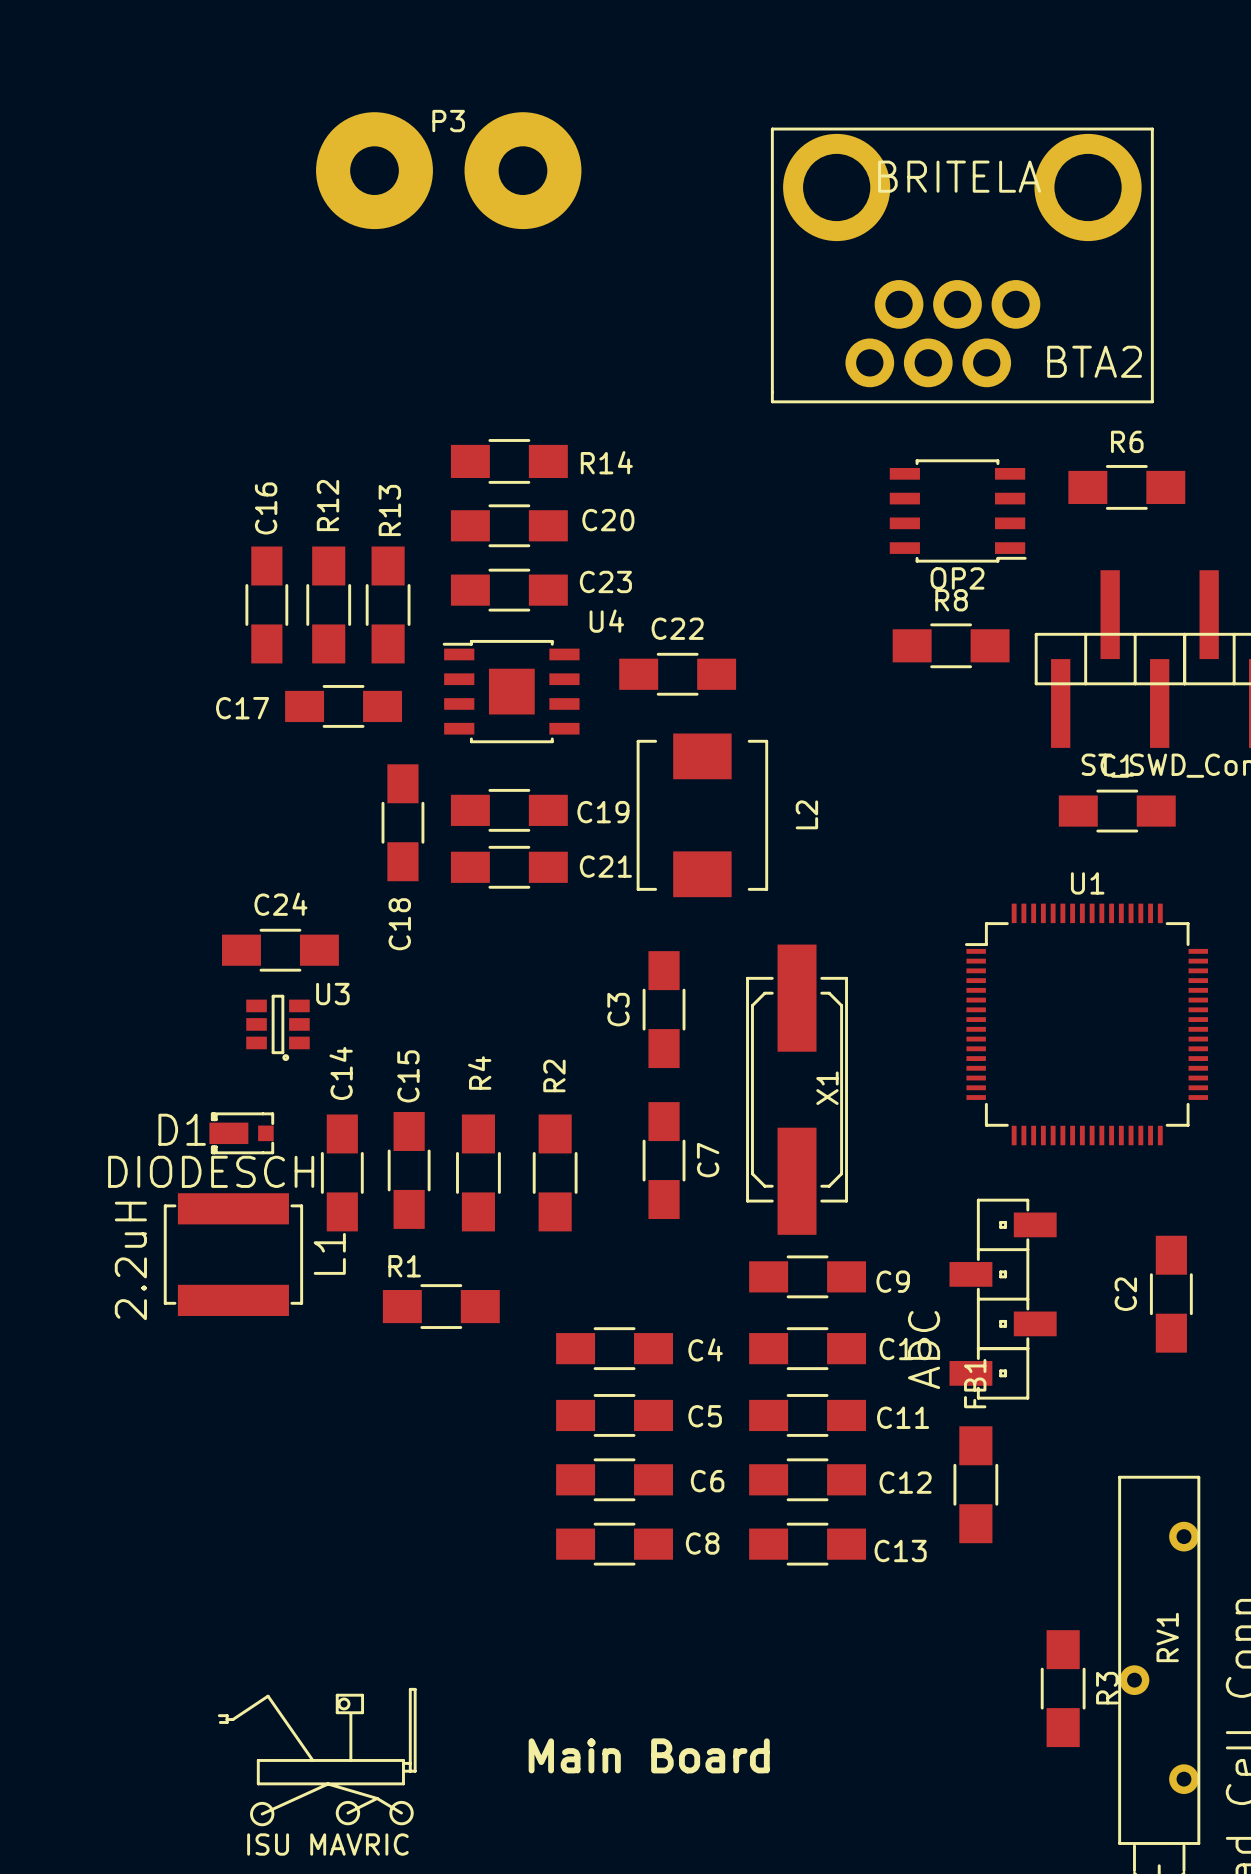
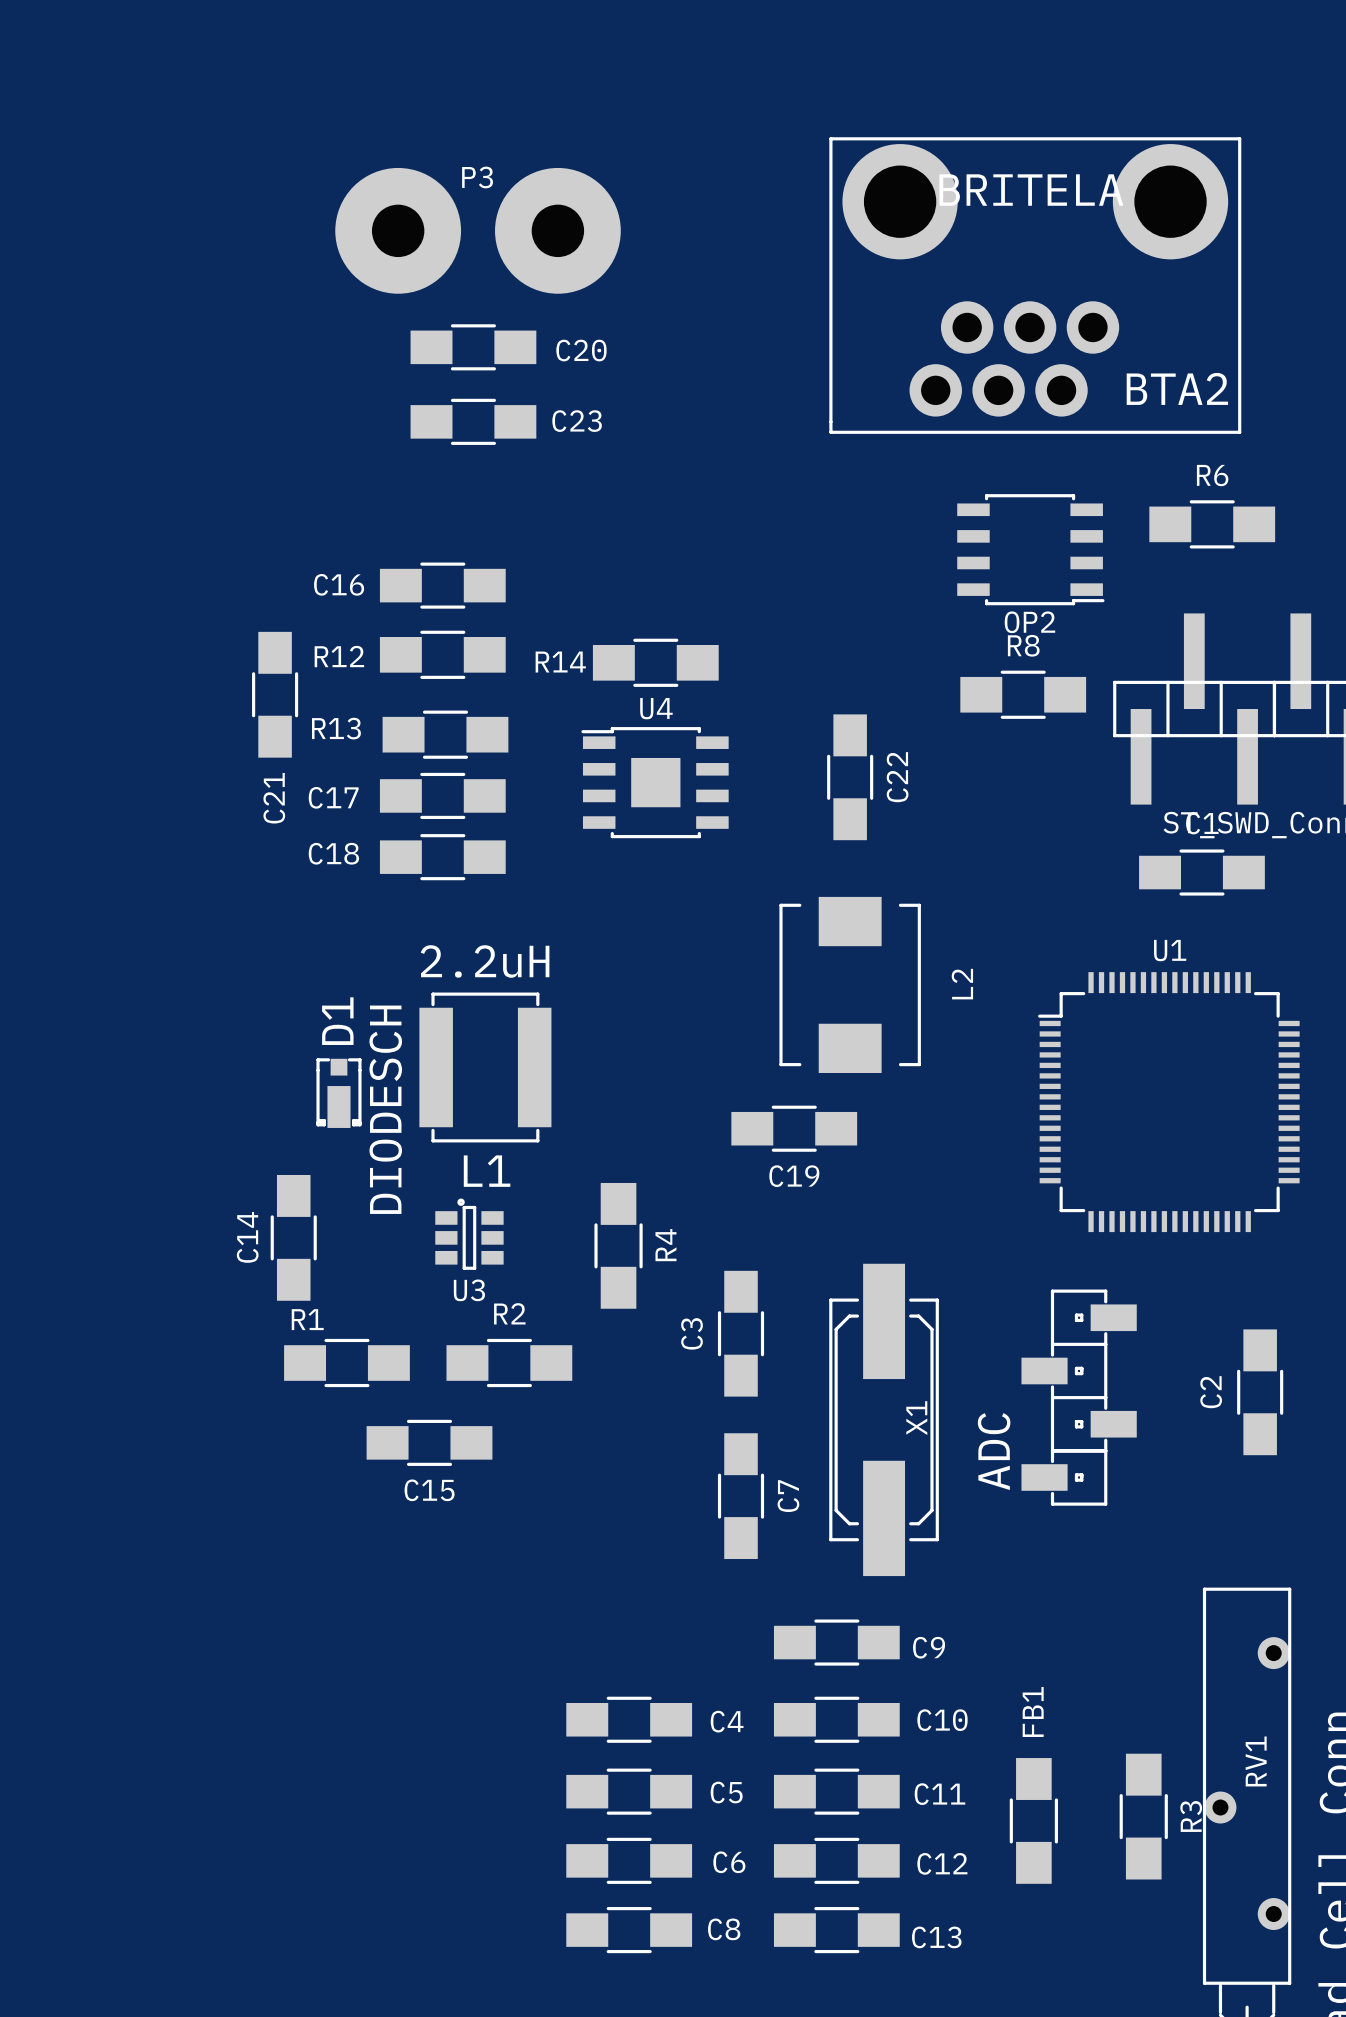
P3 position: (448, 170) -> (478, 230)
R14 position: (509, 461) -> (655, 662)
R14 name position: R14 (606, 462) -> R14 (560, 662)
R12 name position: R12 (327, 505) -> R12 (339, 656)
C16 name position: C16 (266, 508) -> C16 (339, 584)
R13 name position: R13 (389, 510) -> R13 (336, 728)
C20 name position: C20 (608, 520) -> C20 (581, 350)
C20 position: (509, 525) -> (473, 347)
C23 name position: C23 (605, 581) -> C23 (577, 421)
C23 position: (509, 590) -> (473, 421)
C16 rotation: 0° (266, 604) -> 90° clockwise (442, 585)
C16 position: (266, 604) -> (442, 585)
R12 rotation: 0° (328, 604) -> 90° clockwise (442, 654)
R12 position: (328, 604) -> (442, 654)
R13 rotation: 0° (388, 604) -> 90° clockwise (445, 734)
R13 position: (388, 604) -> (445, 734)
U4 name position: U4 (606, 621) -> U4 (656, 708)
C22 rotation: 0° (677, 674) -> 90° clockwise (850, 777)
C22 position: (677, 674) -> (850, 777)
U4 position: (511, 691) -> (655, 782)
C17 position: (343, 706) -> (442, 795)
C19 position: (509, 810) -> (794, 1128)
C19 name position: C19 (603, 812) -> C19 (794, 1176)
L2 position: (702, 815) -> (850, 984)
C18 rotation: 0° (402, 822) -> 90° clockwise (442, 857)
C21 rotation: 0° (509, 867) -> 90° clockwise (275, 694)
C21 position: (509, 867) -> (275, 694)
C24: (280, 950) -> none
U3 name position: U3 (332, 994) -> U3 (469, 1290)
C3 position: (664, 1009) -> (741, 1333)
U3 rotation: 0° (277, 1027) -> 180° (469, 1234)
U3 position: (277, 1027) -> (469, 1234)
C14 name position: C14 (341, 1073) -> C14 (247, 1237)
R4 name position: R4 (479, 1073) -> R4 (665, 1245)
R2 name position: R2 (554, 1075) -> R2 (509, 1313)
C15 name position: C15 (408, 1076) -> C15 (429, 1490)
X1 position: (797, 1089) -> (884, 1419)
D1 name position: D1 (182, 1129) -> D1 (337, 1021)
D1 rotation: 0° (241, 1133) -> 90° counterclockwise (338, 1093)
D1 position: (241, 1133) -> (338, 1093)
C7 position: (664, 1160) -> (741, 1496)
C15 rotation: 0° (409, 1170) -> 90° clockwise (429, 1442)
C15 position: (409, 1170) -> (429, 1442)
C14 position: (342, 1172) -> (293, 1237)
R4 position: (478, 1172) -> (618, 1245)
R2 rotation: 0° (555, 1172) -> 90° clockwise (509, 1363)
R2 position: (555, 1172) -> (509, 1363)
L1 rotation: 0° (233, 1254) -> 90° clockwise (485, 1067)
L1 position: (233, 1254) -> (485, 1067)
C9 position: (807, 1276) -> (836, 1642)
R1 position: (441, 1306) -> (346, 1363)
C4 position: (614, 1348) -> (629, 1719)
C10 position: (807, 1348) -> (836, 1719)
C5 position: (614, 1415) -> (629, 1791)
C11 position: (807, 1415) -> (836, 1791)
C6 position: (614, 1479) -> (629, 1860)
C12 position: (807, 1479) -> (836, 1860)
FB1 position: (975, 1484) -> (1033, 1820)
C8 position: (614, 1544) -> (629, 1930)
C13 position: (807, 1544) -> (836, 1930)
text: Main Board (649, 1755) -> none
ISU MAVRIC: (317, 1757) -> none

